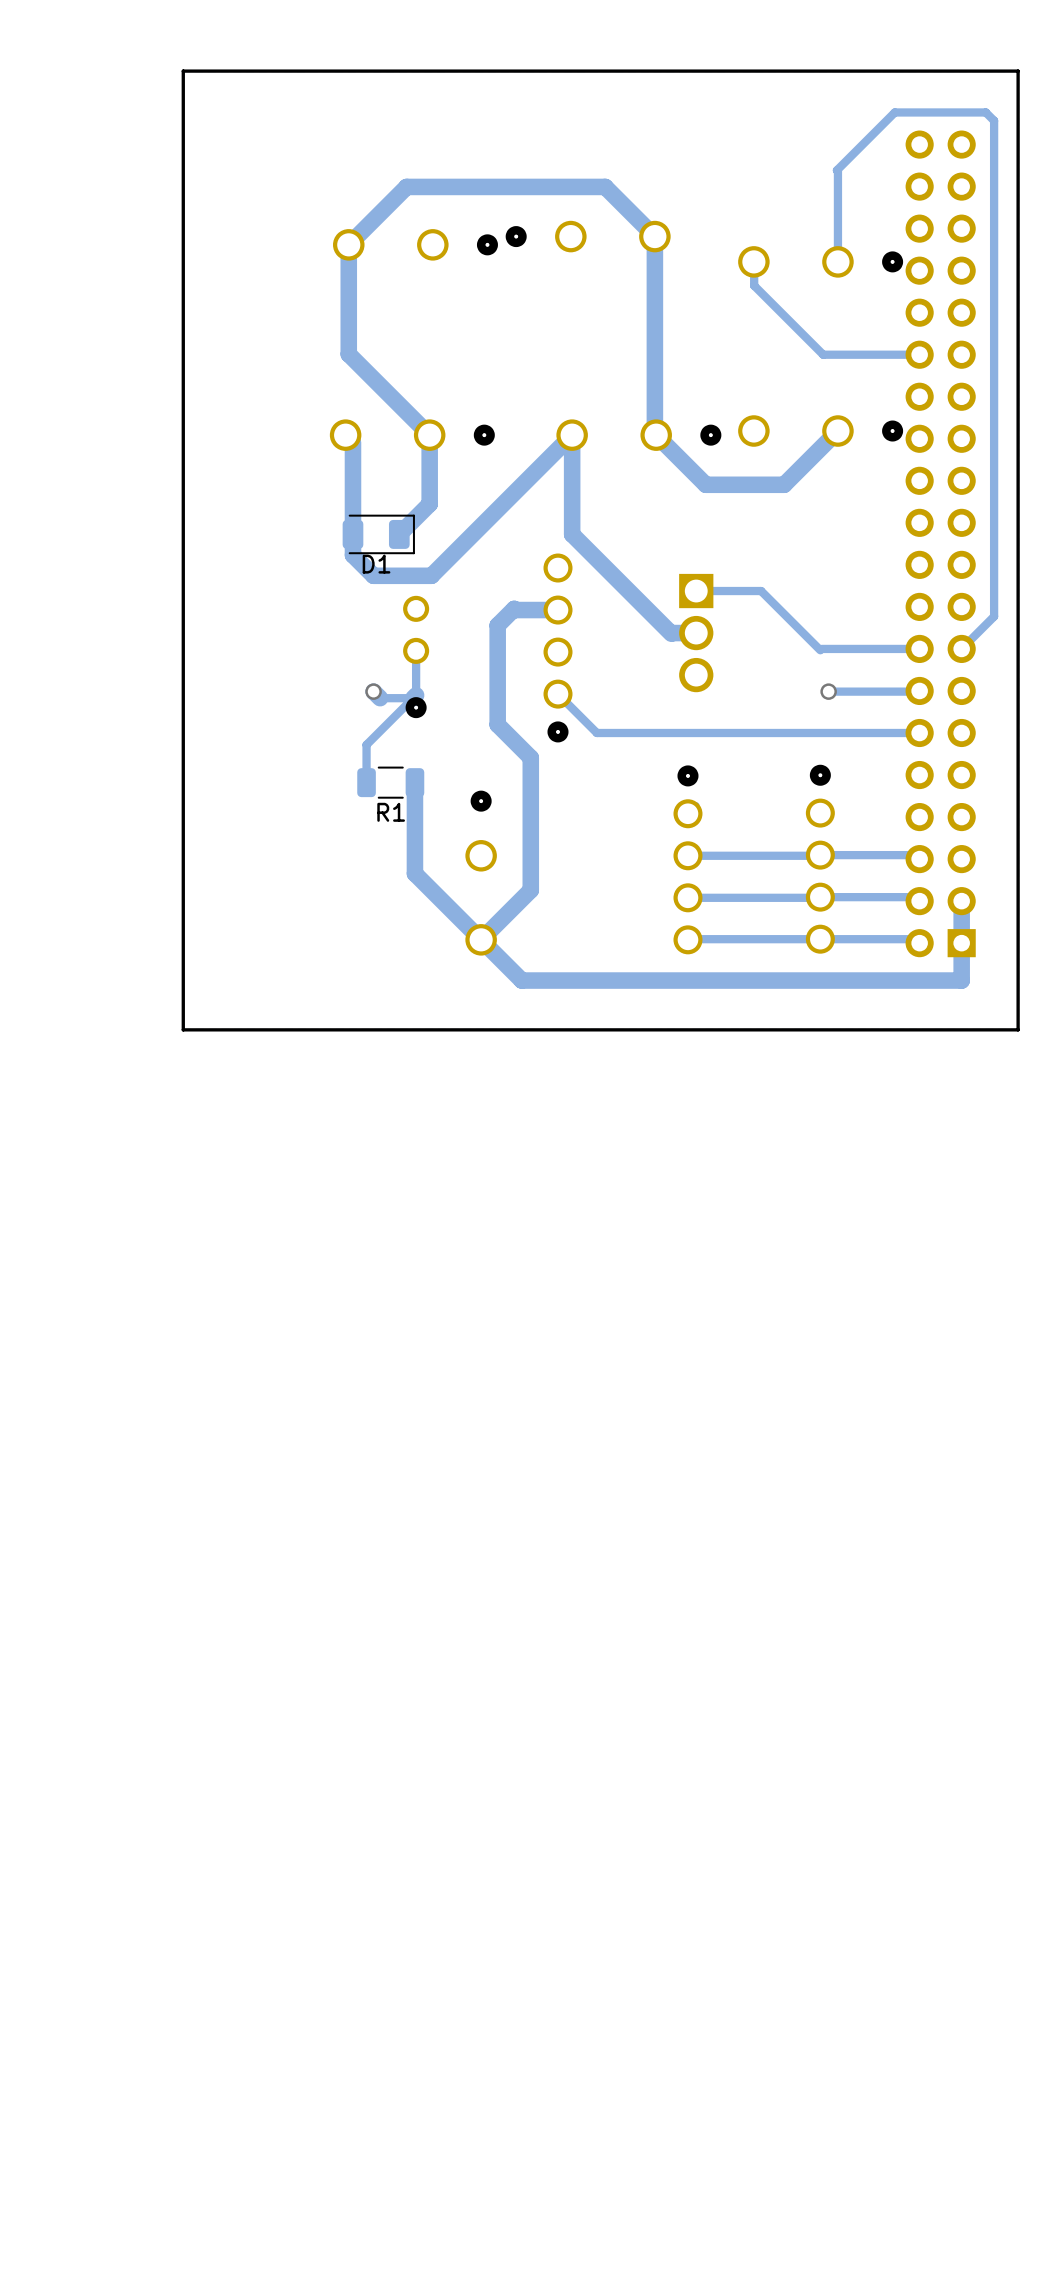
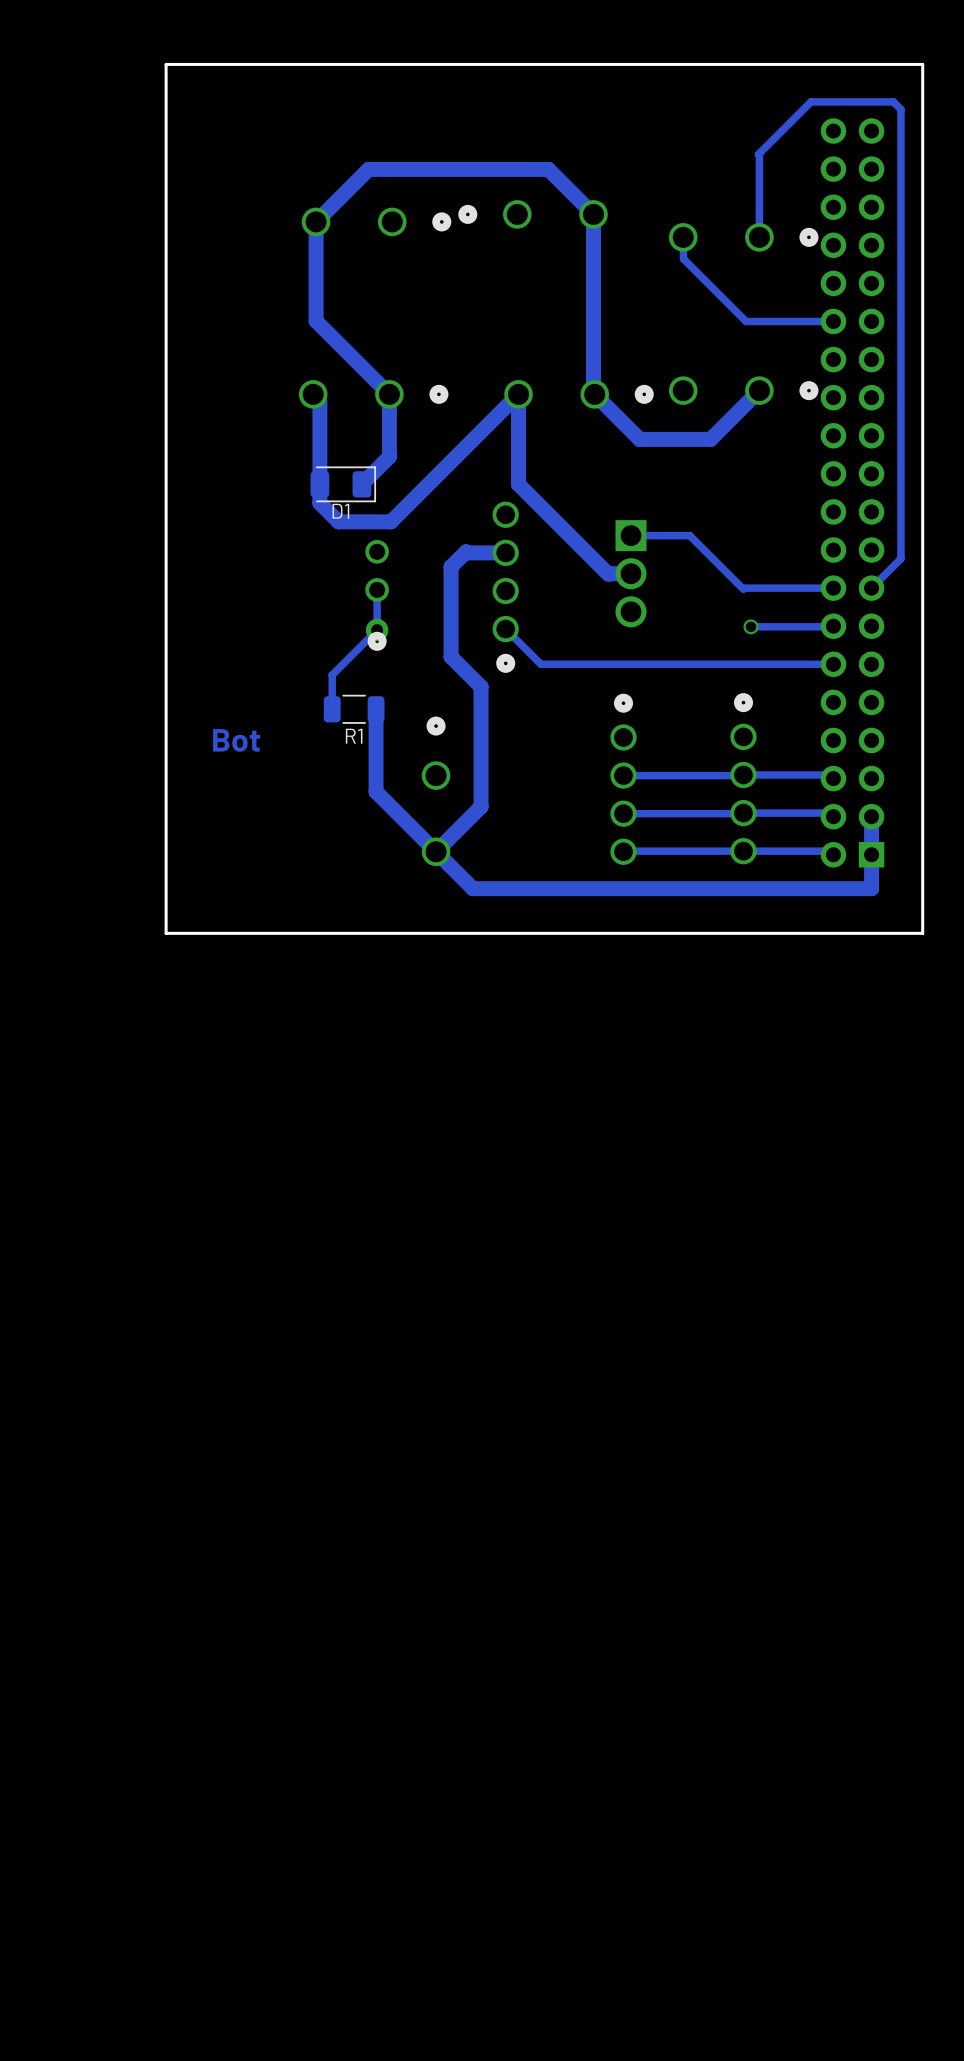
track: (373, 691) (380, 698) (413, 698) (416, 695) -> none
via: (373, 691) -> none
via: none -> (377, 630)
text: none -> Bot (236, 740)

